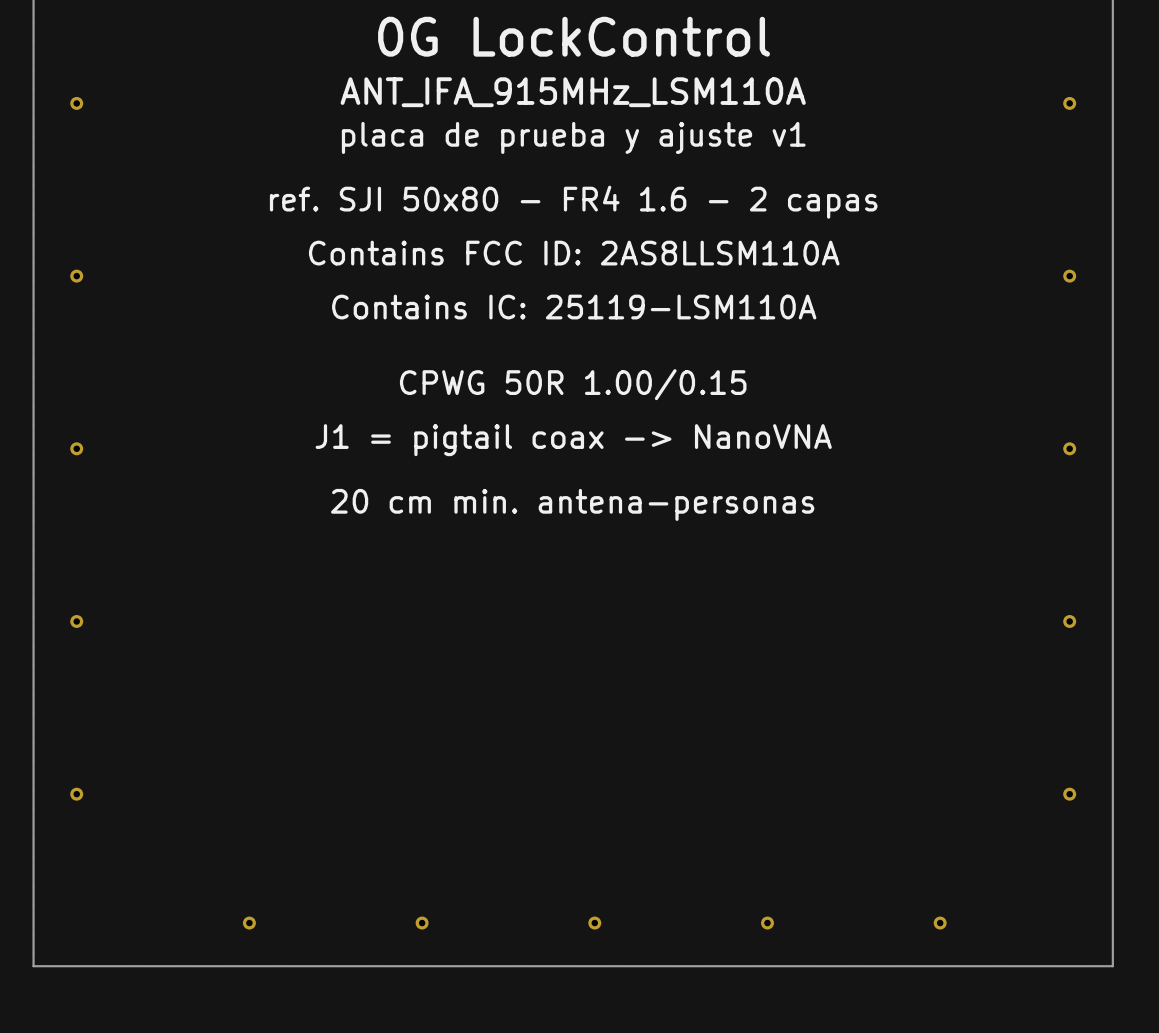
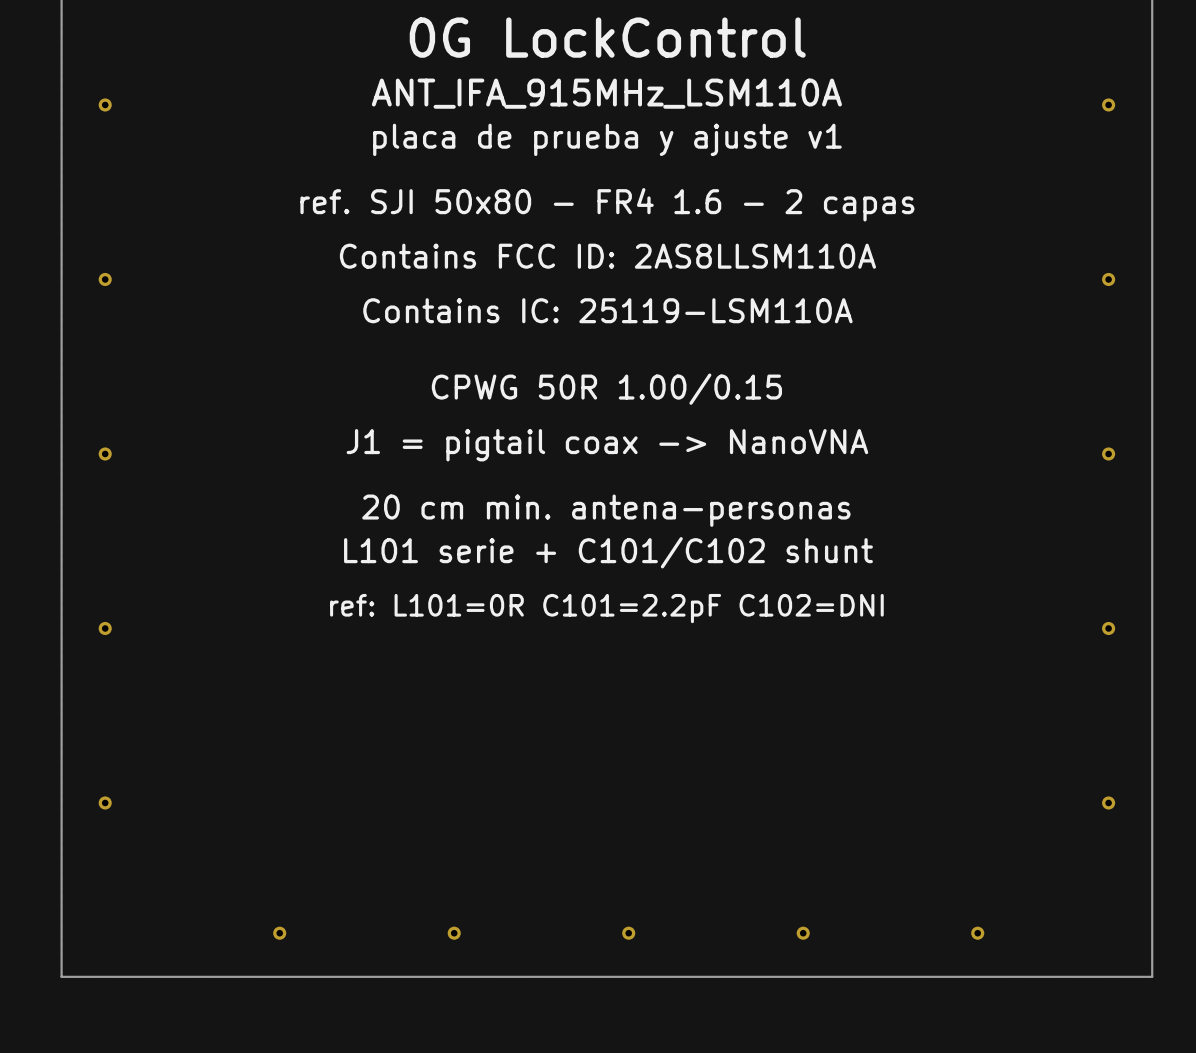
text: none -> L101 serie + C101/C102 shunt (608, 552)
text: none -> ref: L101=0R C101=2.2pF C102=DNI (606, 608)

